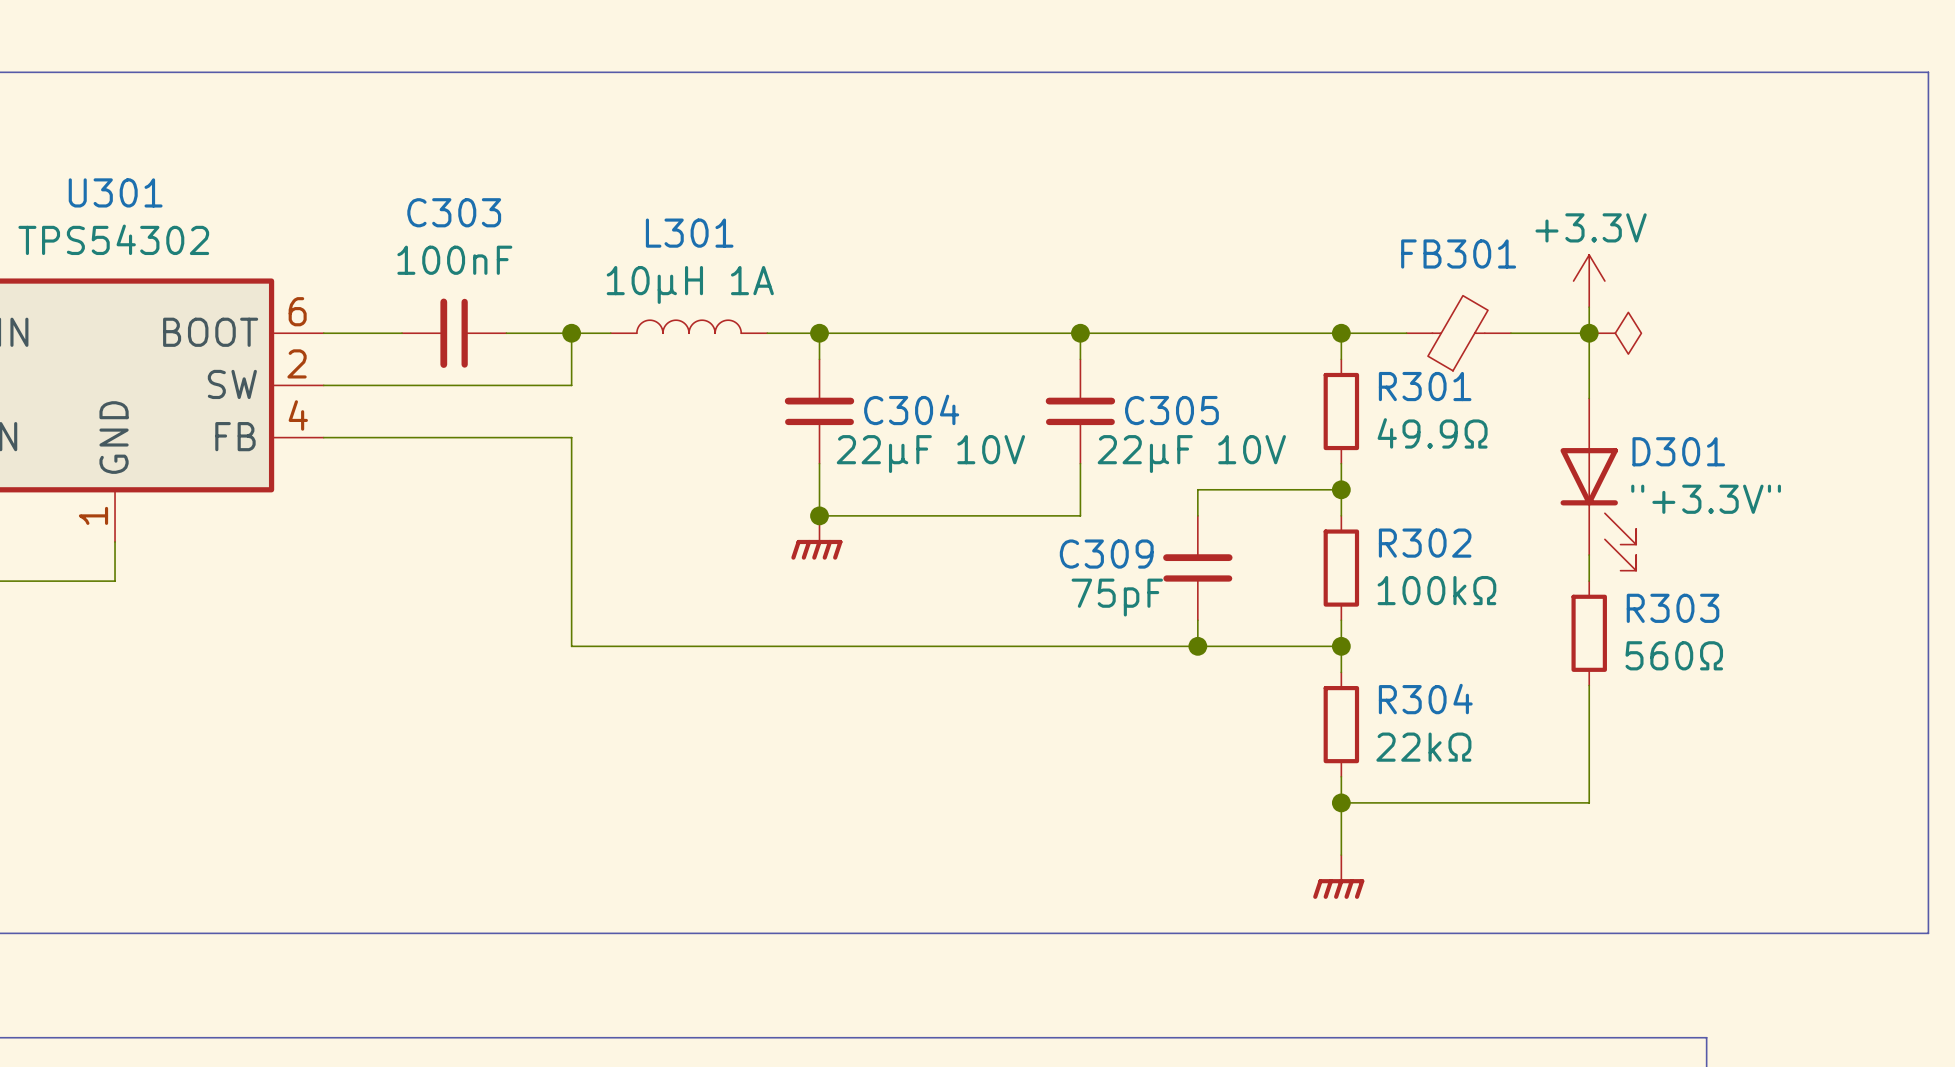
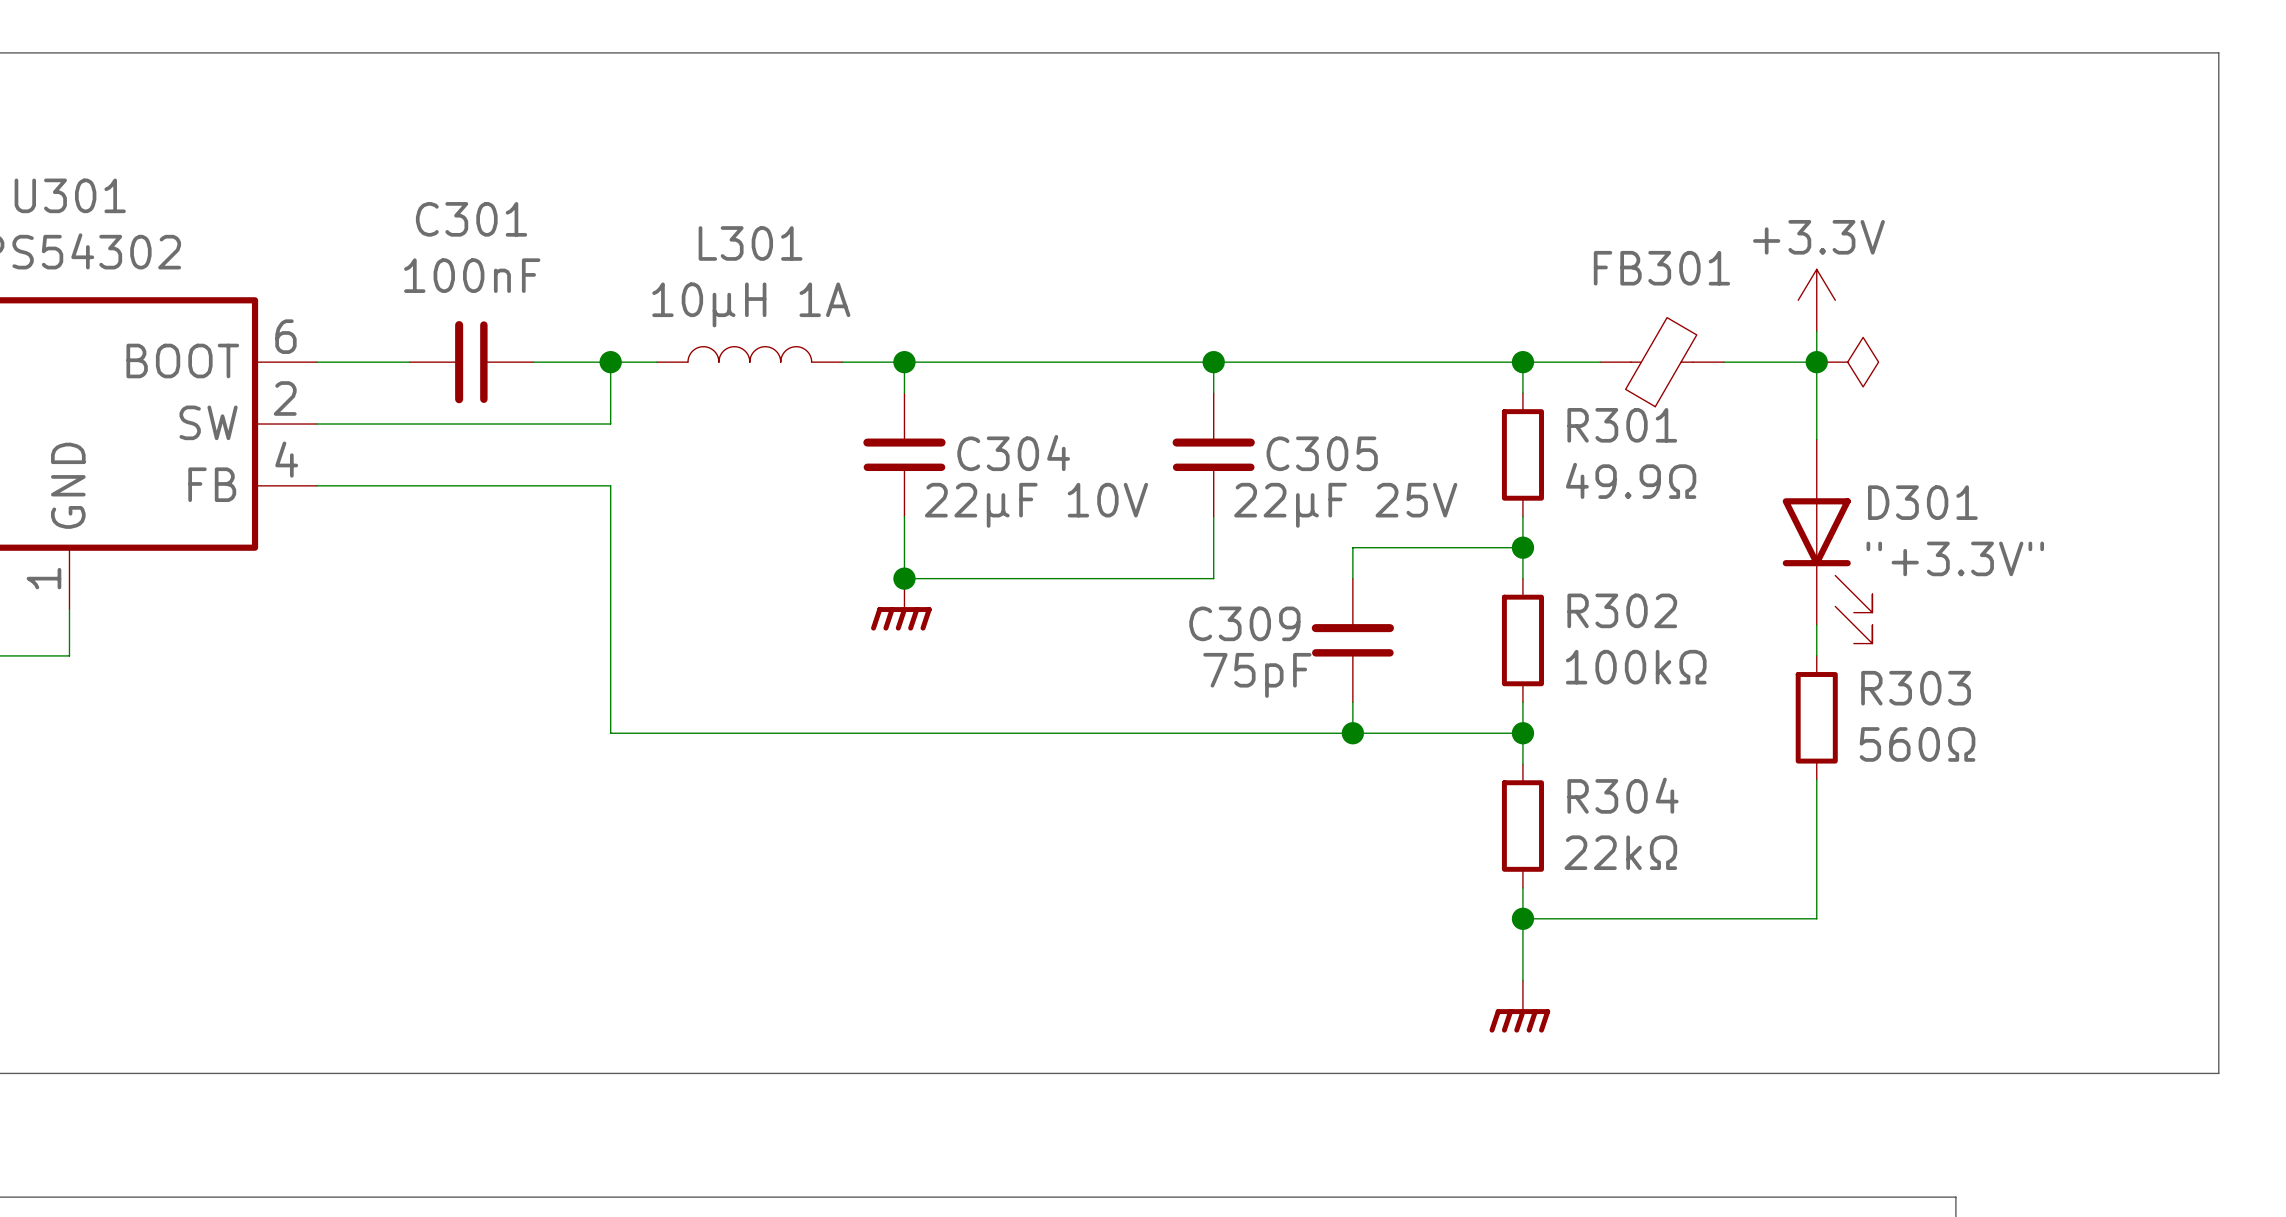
C303 name: C303 (454, 212) -> C301 (471, 219)
C305 value: 22µF 10V (1191, 454) -> 22µF 25V (1345, 505)

